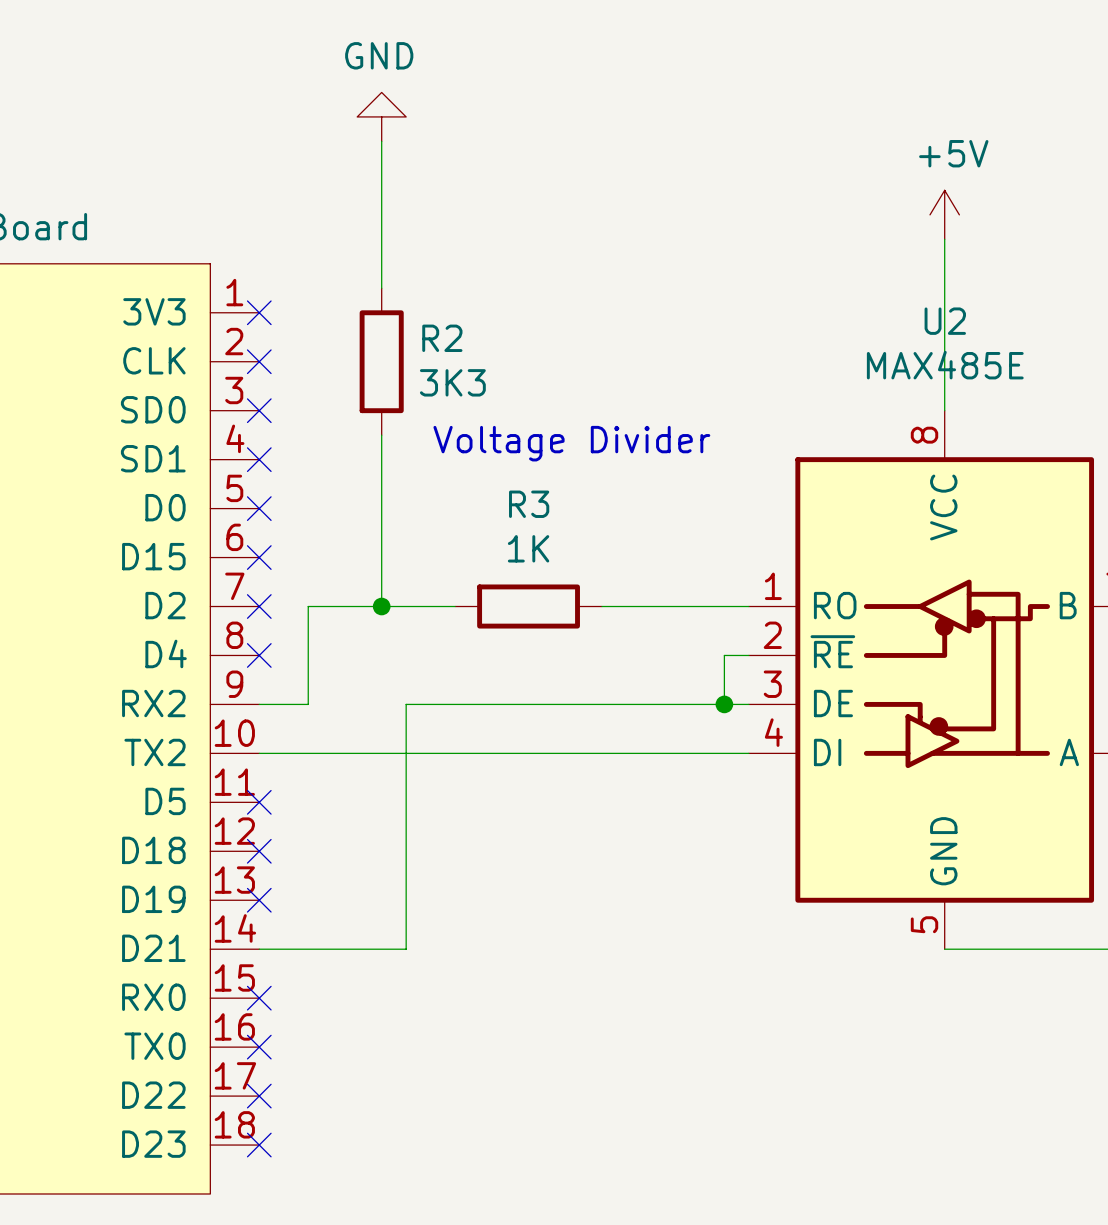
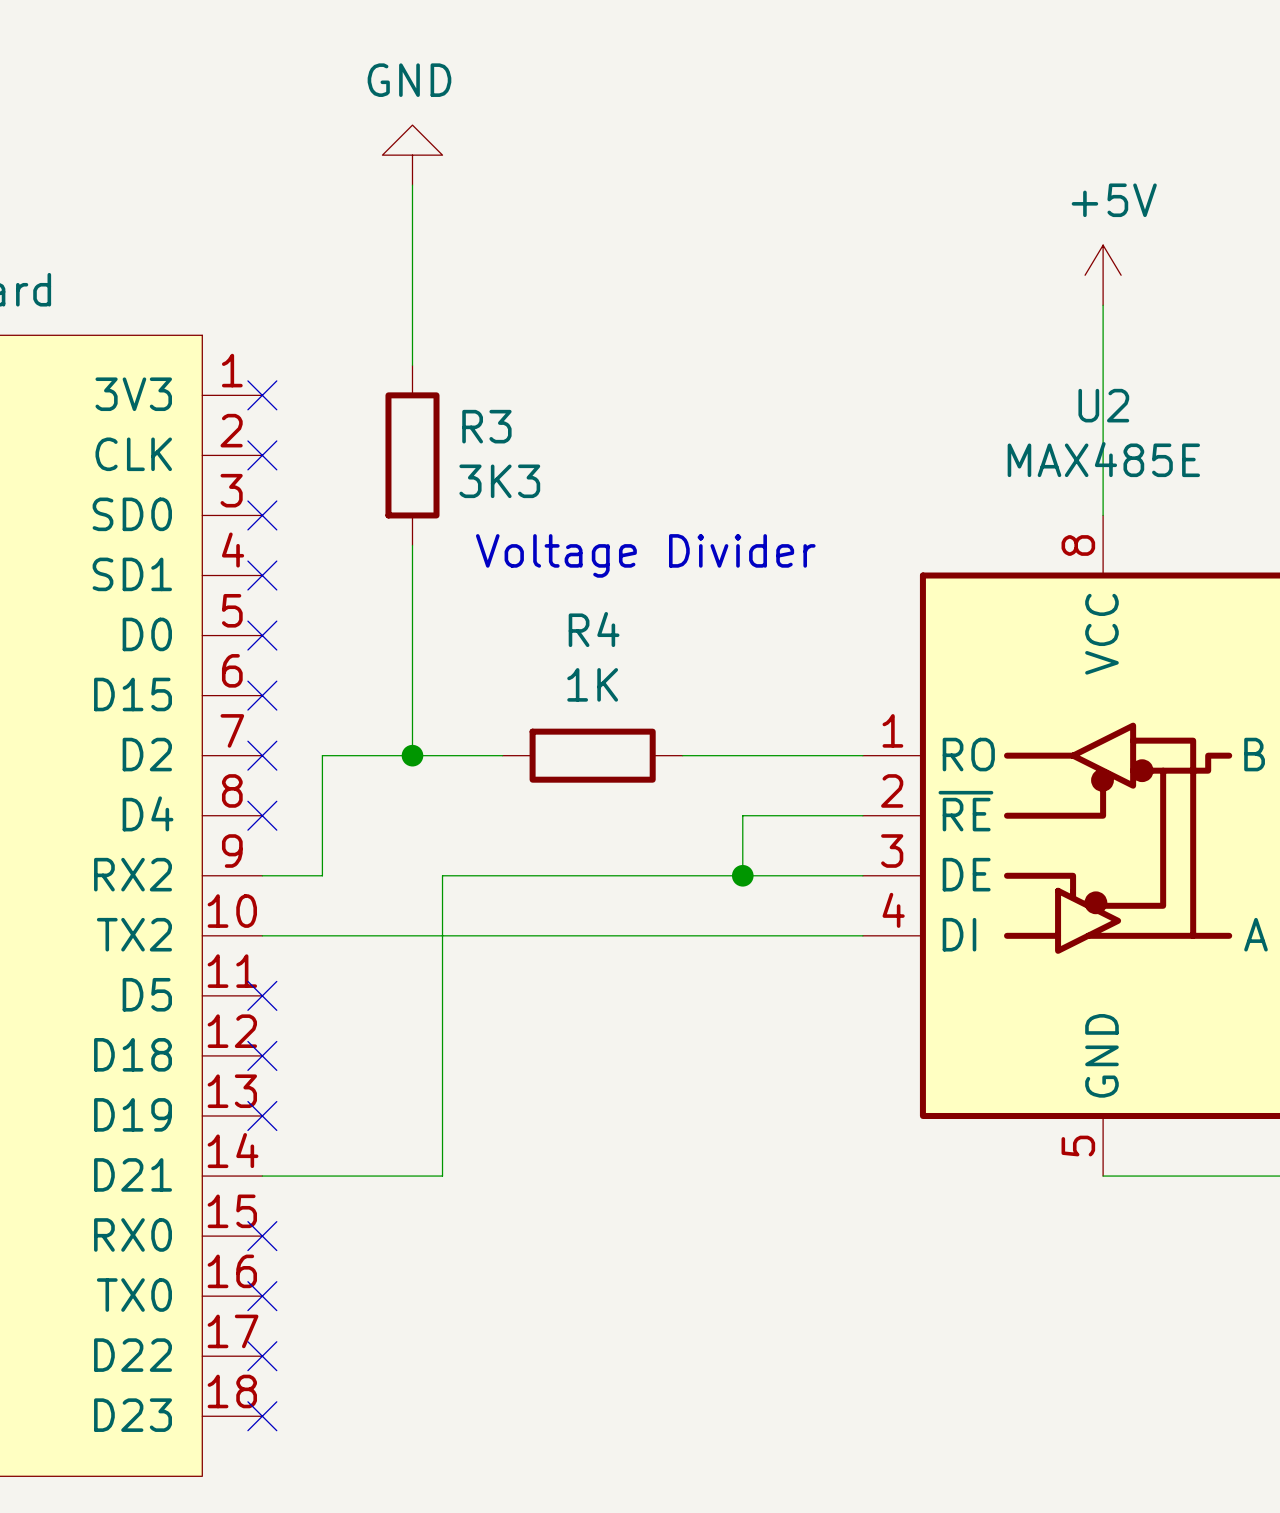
R2 name: R2 (442, 338) -> R3 (486, 426)
R3 name: R3 (529, 504) -> R4 (594, 629)
wire: (724, 655) (724, 704) -> (832, 815) (742, 815) (742, 875)
junction position: (724, 704) -> (742, 875)

